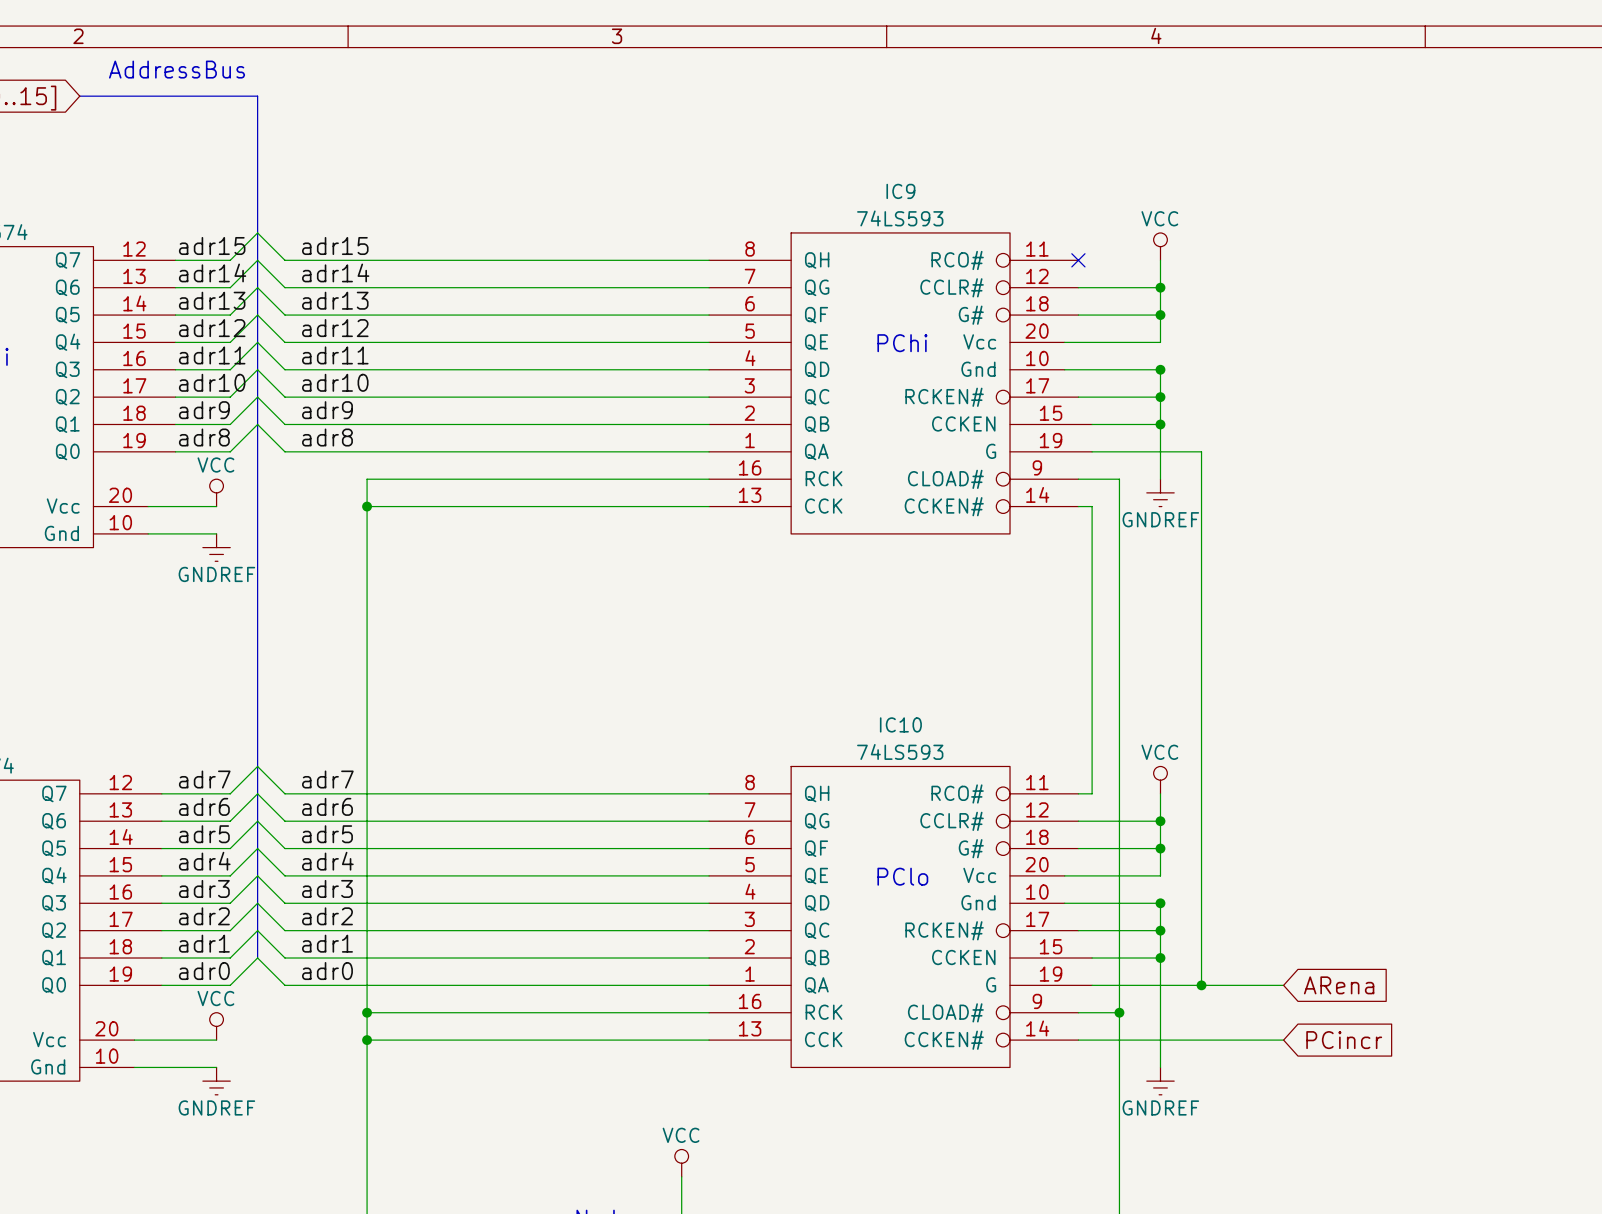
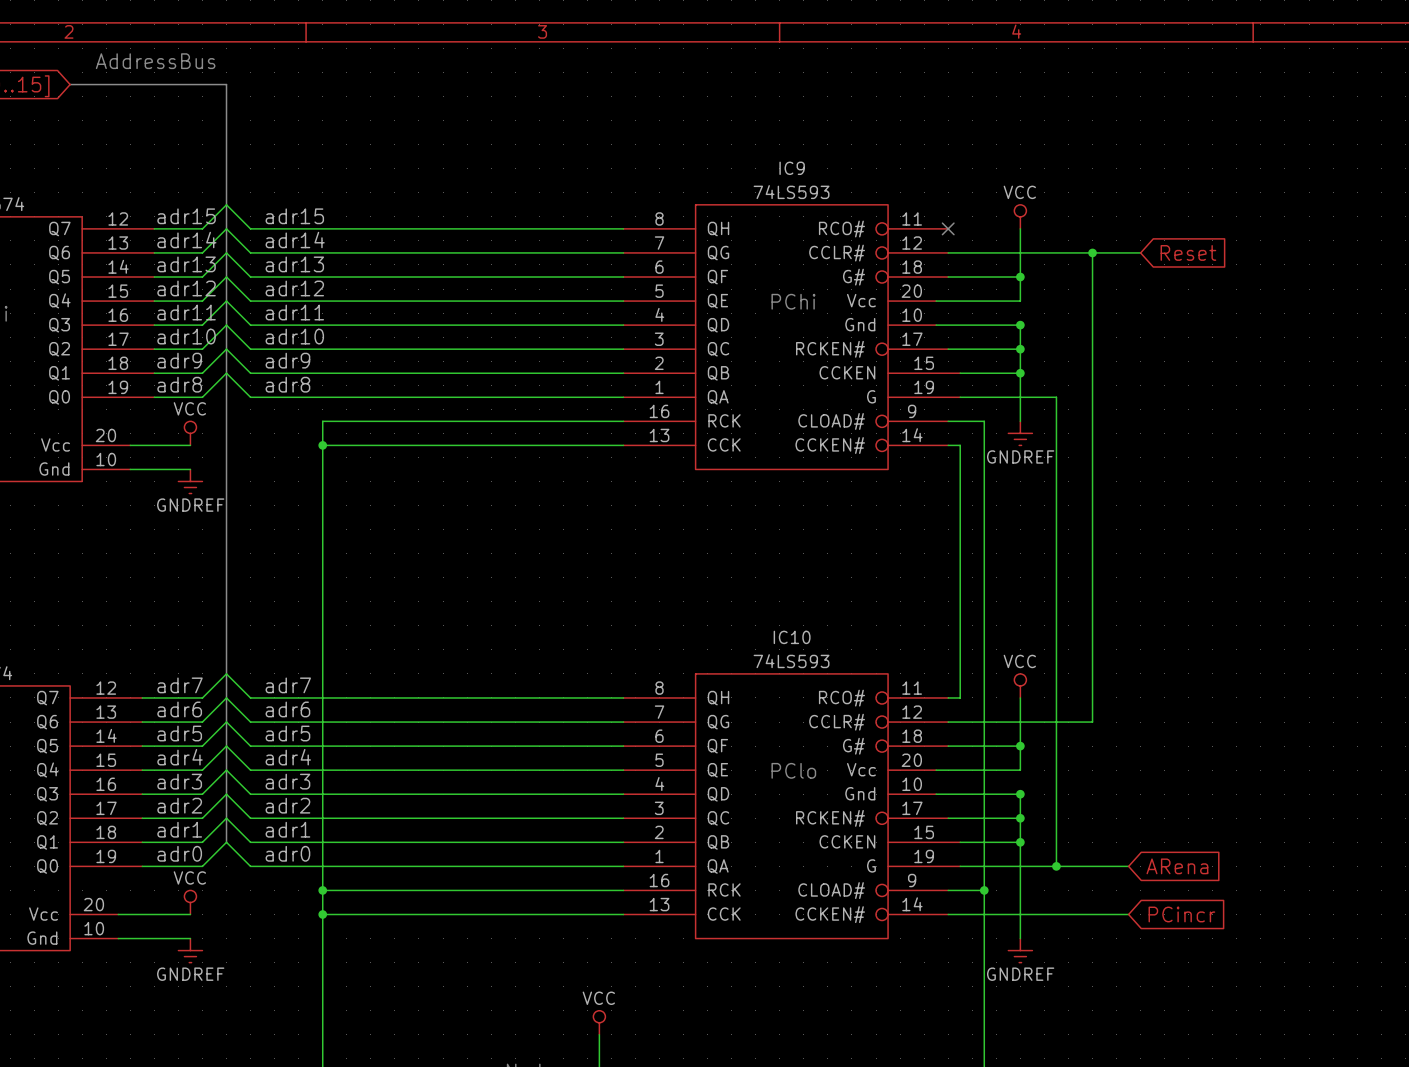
wire: none -> (1020, 252) (1140, 252)
junction: (1160, 287) -> none
wire: none -> (1092, 252) (1092, 722) (1020, 722)
junction: none -> (1092, 252)
global label: none -> Reset (1188, 252)
junction: (1160, 821) -> none

